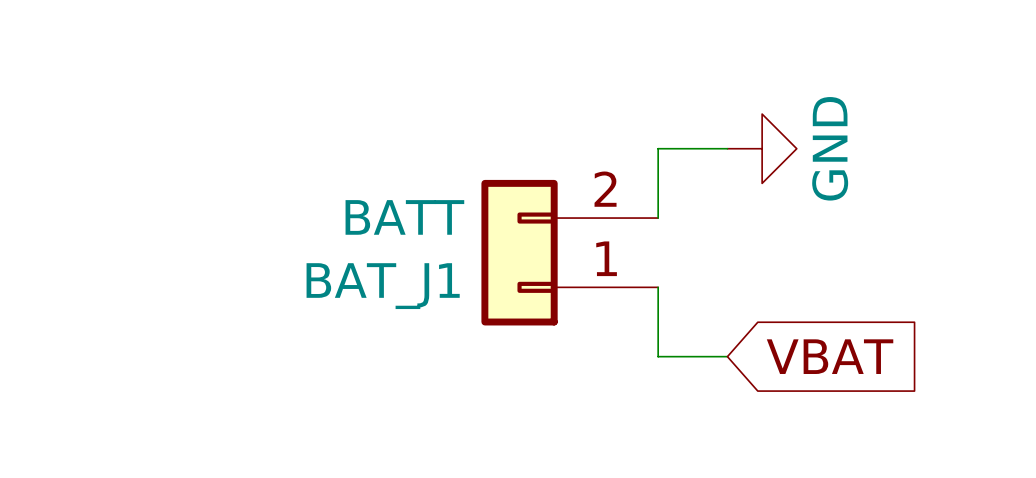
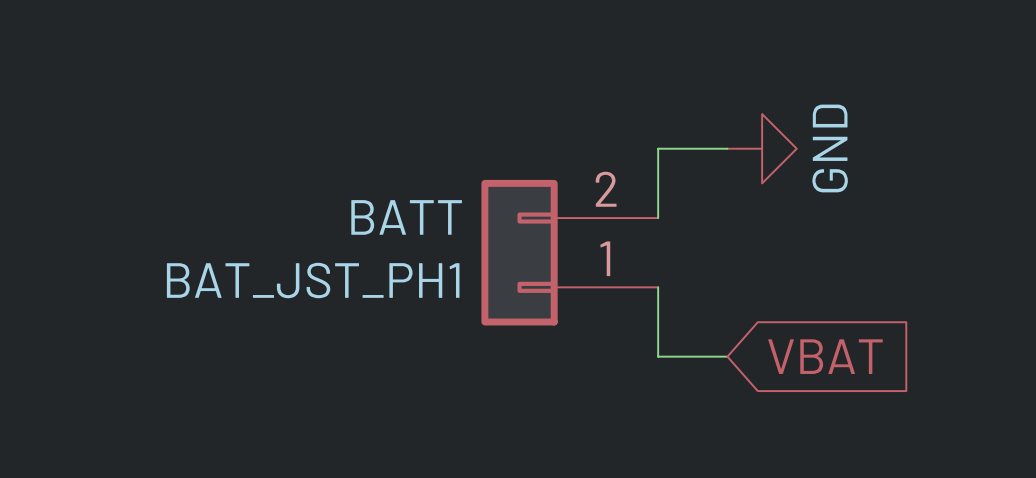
BAT_J1 name: BAT_J1 (383, 286) -> BAT_JST_PH1 (313, 280)

